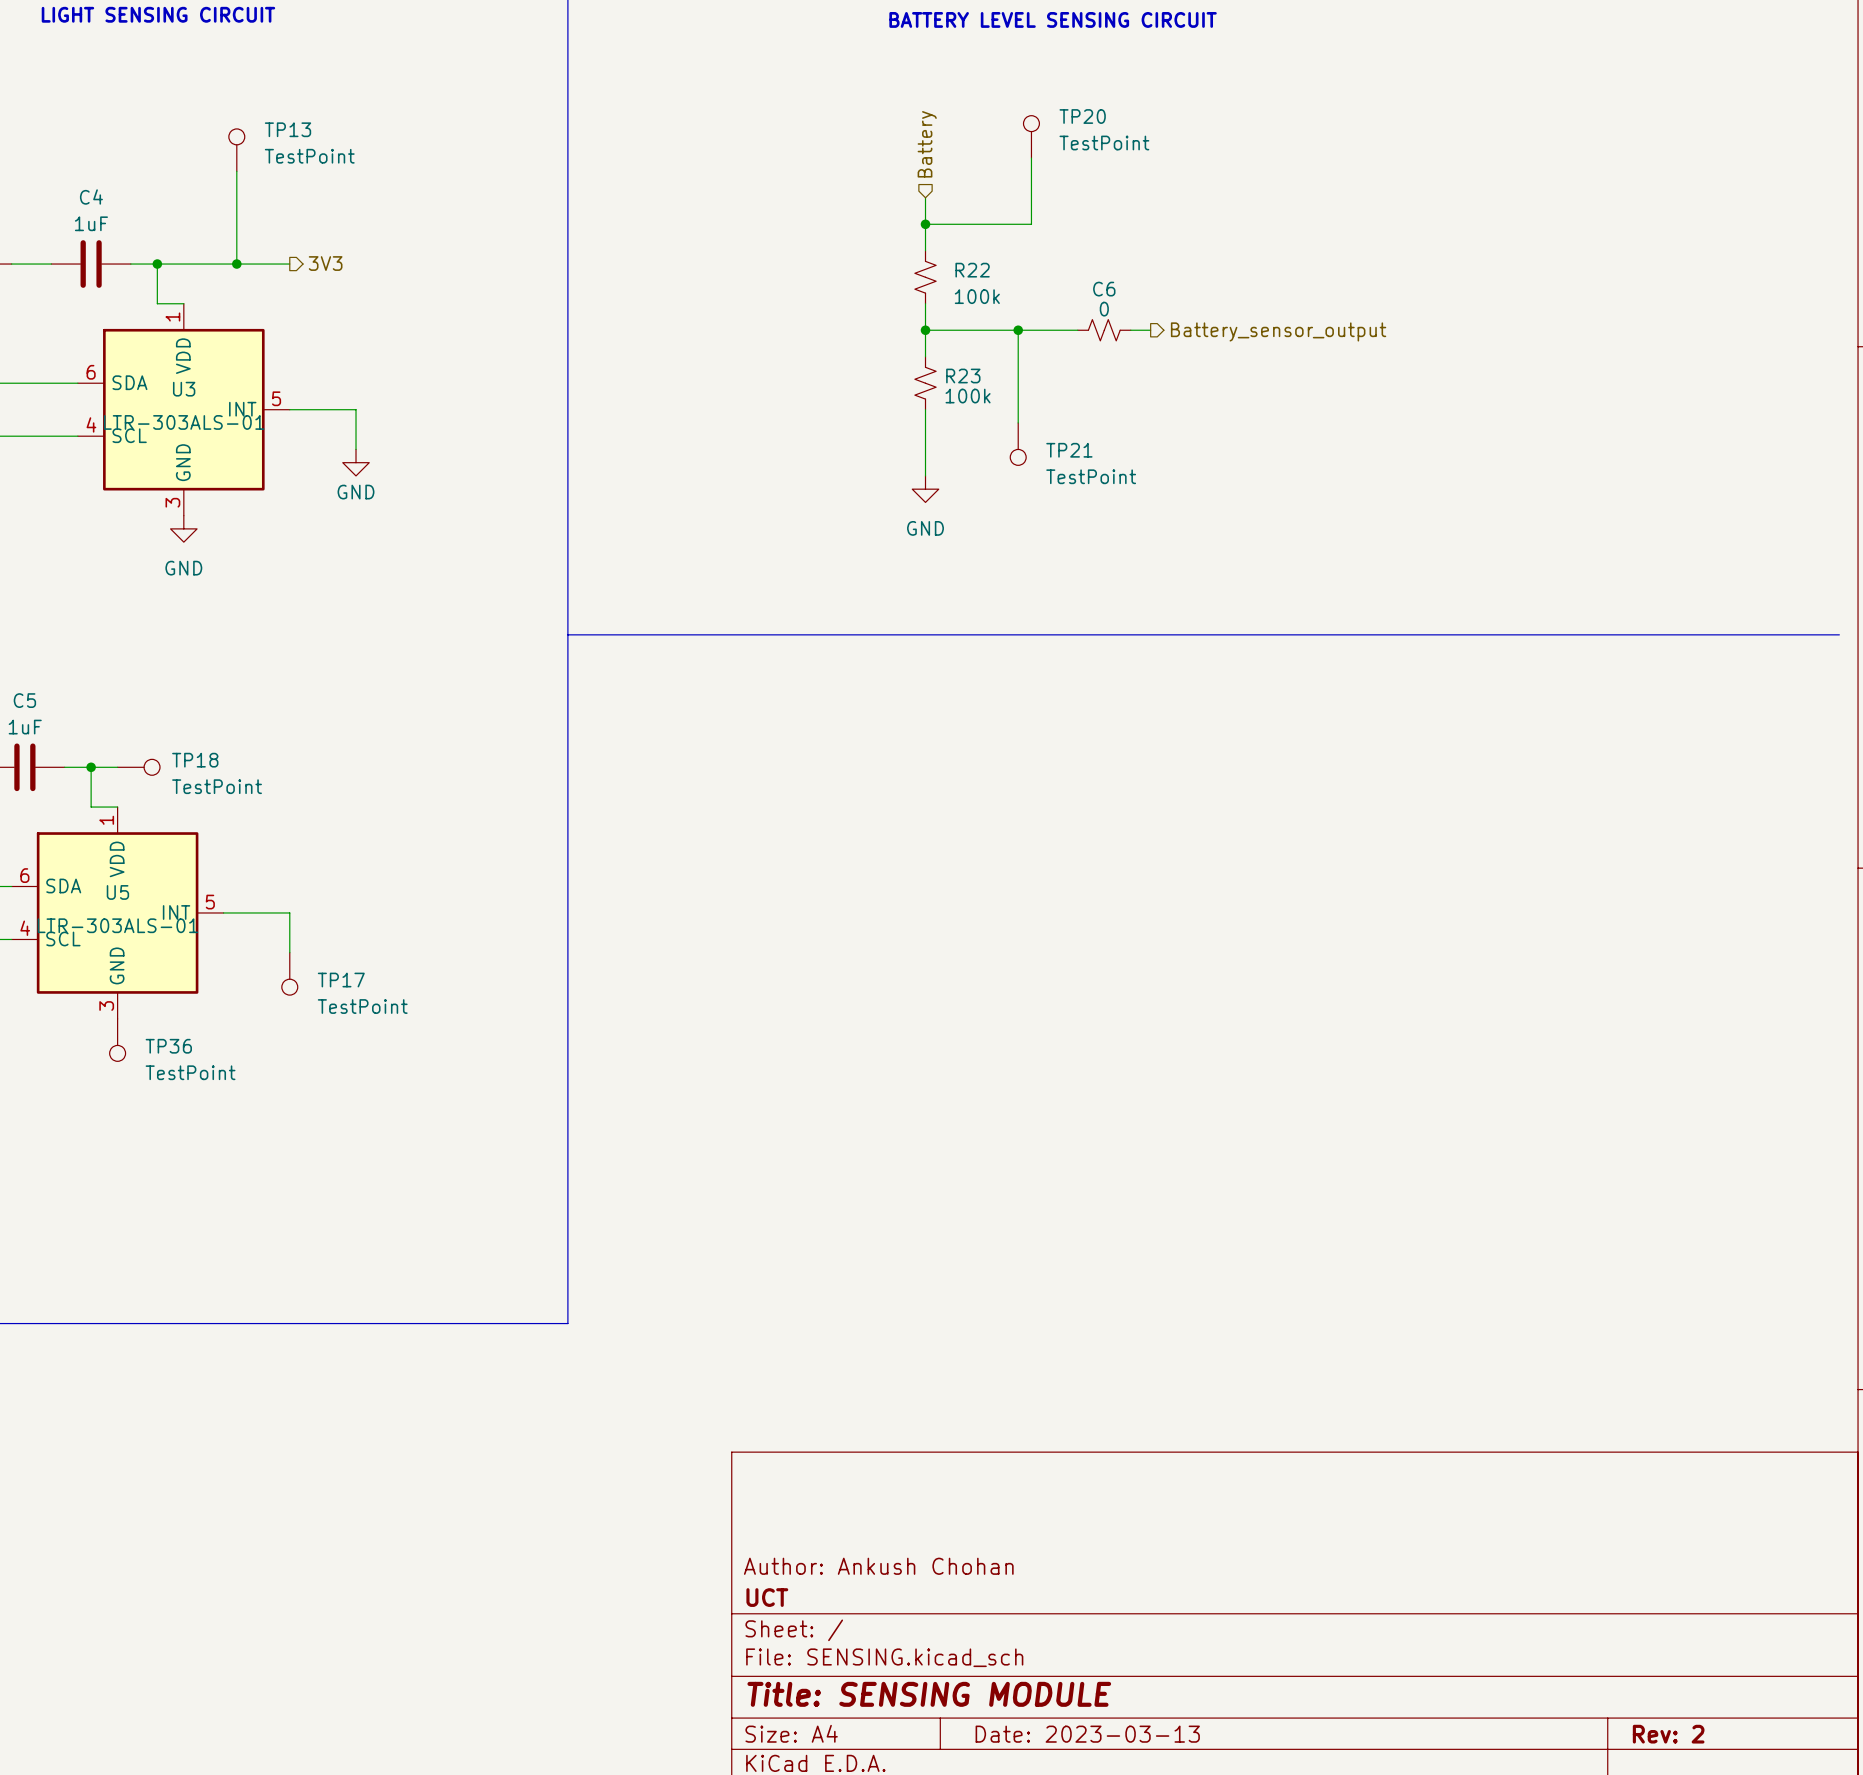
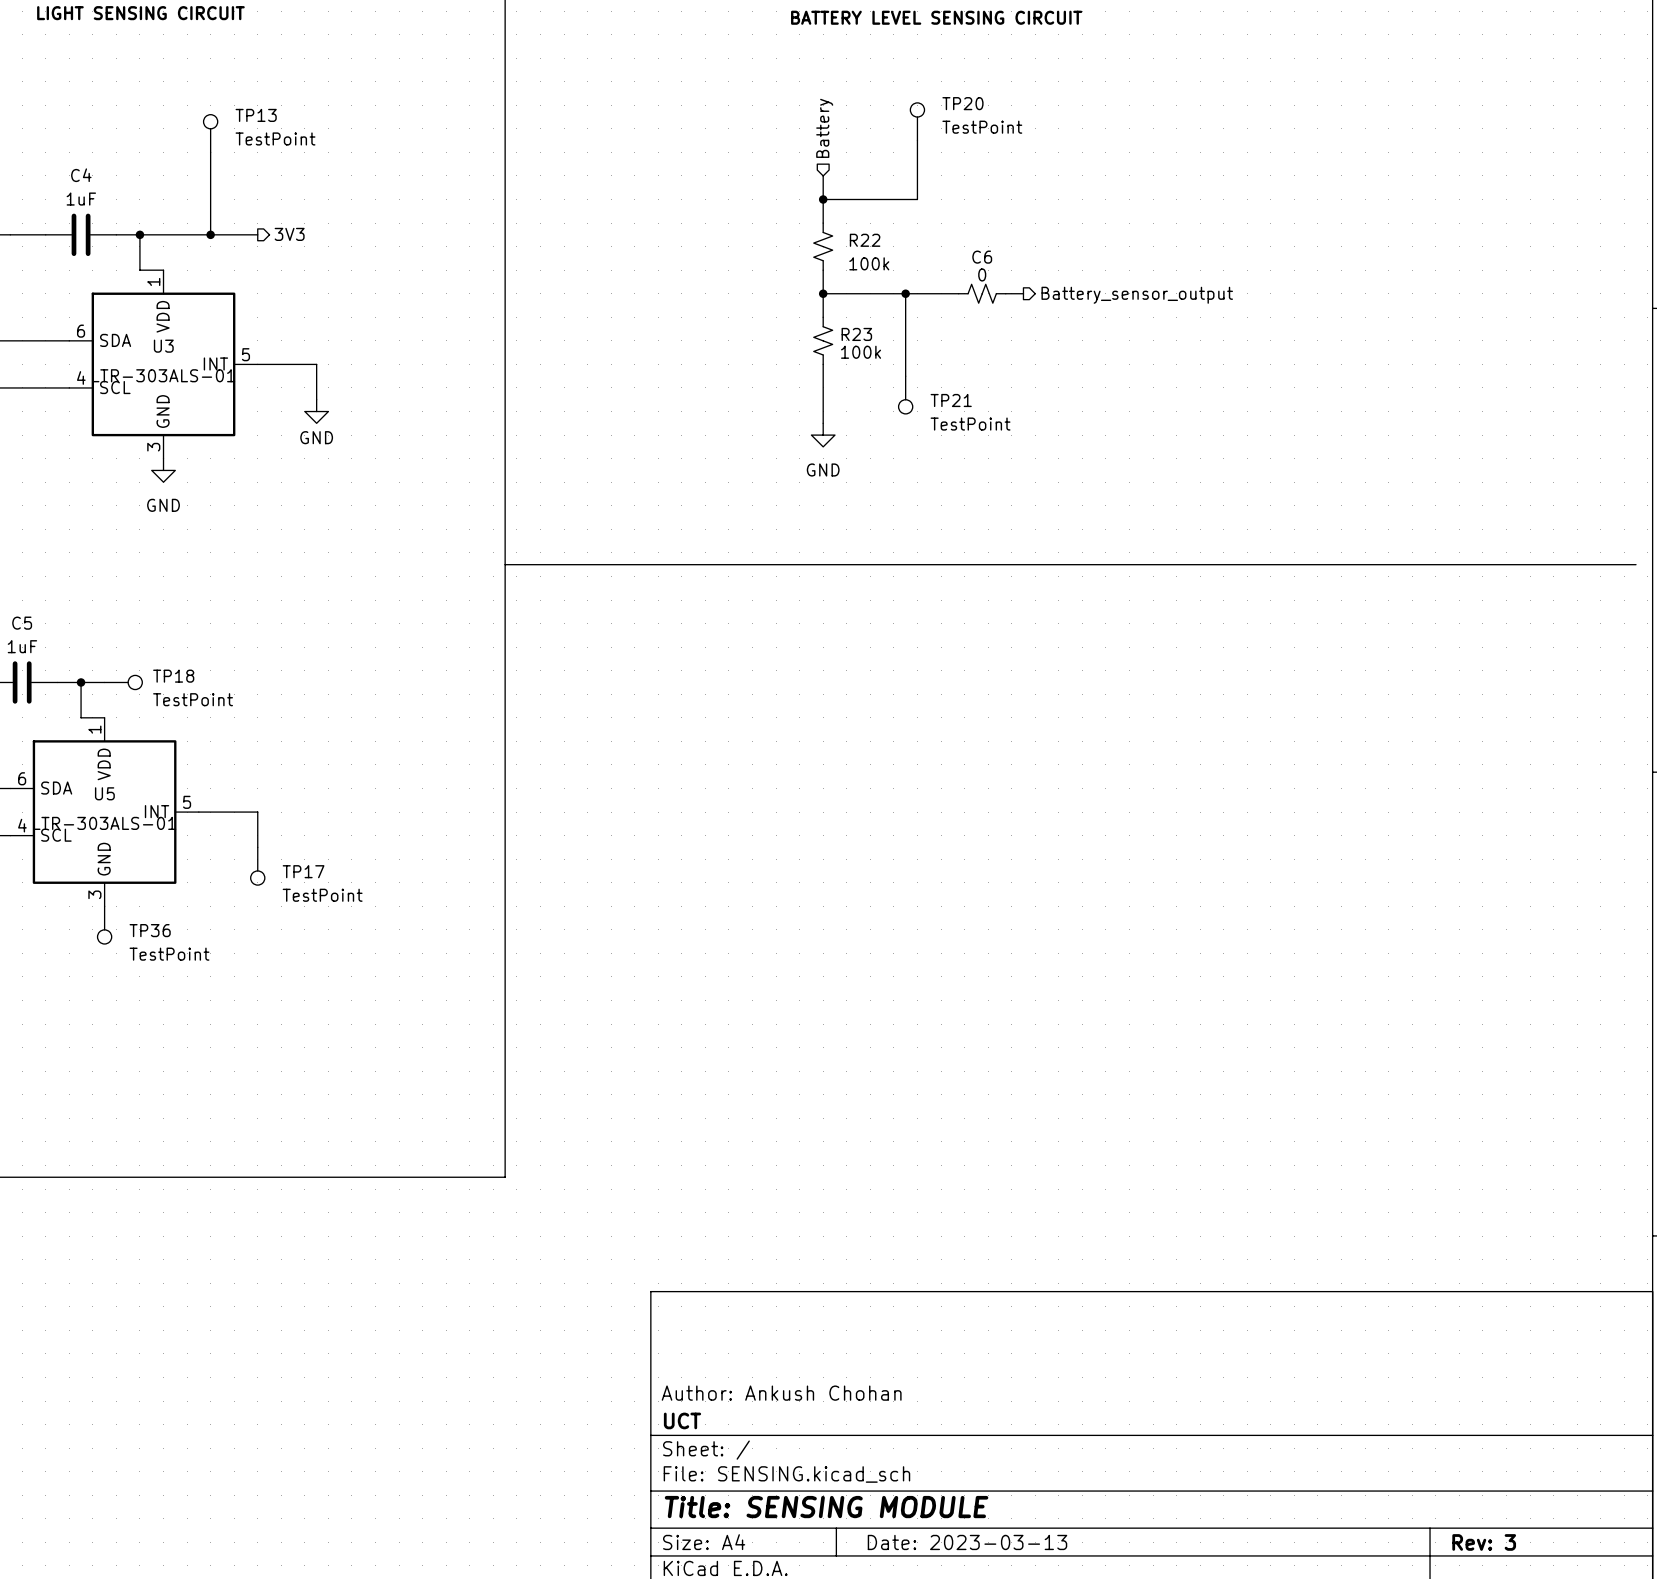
title block: Rev: 2 (1668, 1734) -> Rev: 3 (1484, 1542)

